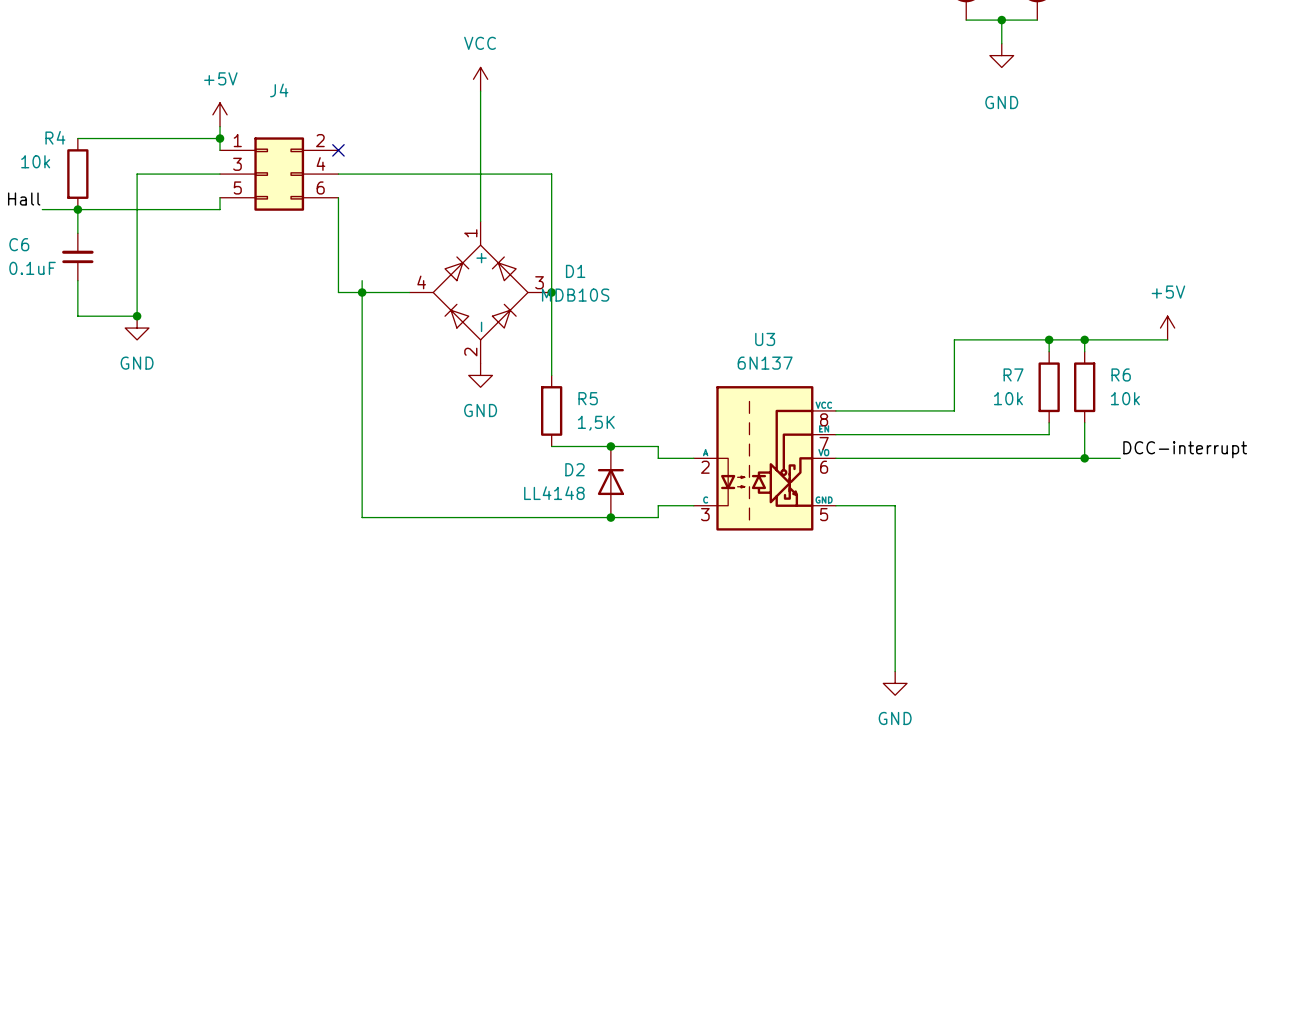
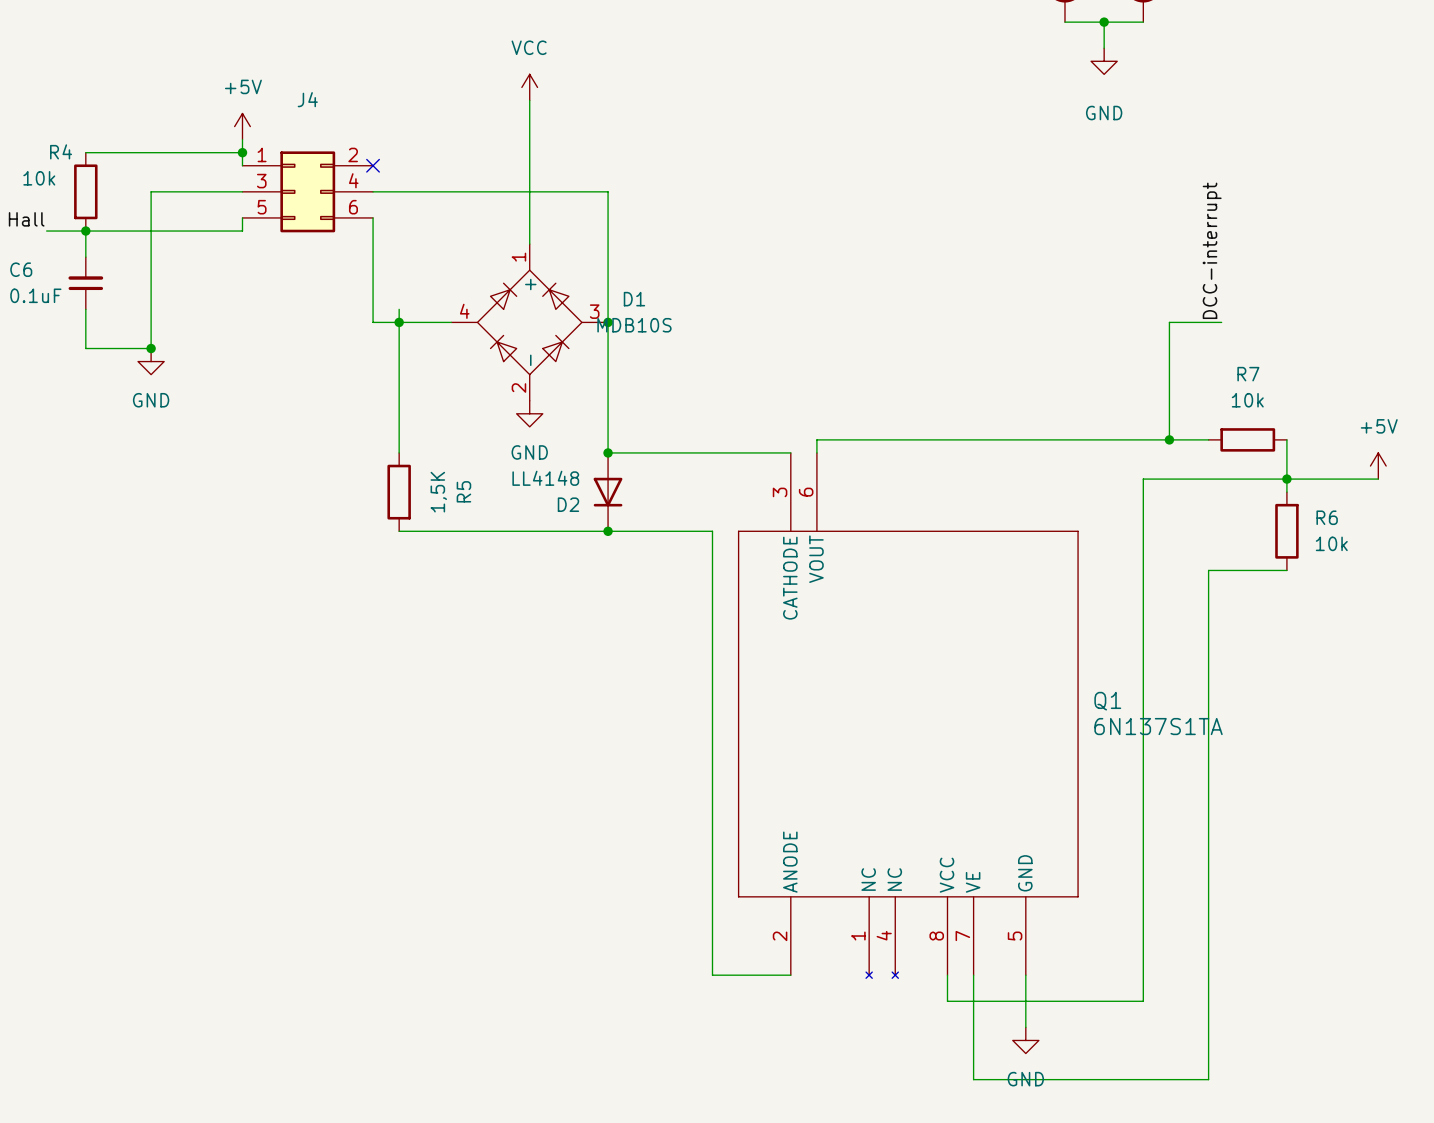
wire: none -> (1221, 322) (1169, 322) (1169, 439)
power symbol position: +5V (1167, 328) -> +5V (1378, 466)
wire: (1049, 339) (1049, 351) -> none
junction: (1049, 339) -> none
wire: (1084, 339) (1084, 351) -> none
junction: (1084, 339) -> none
wire: (1167, 339) (954, 339) (954, 410) (835, 410) -> none
R7 name position: R7 (1013, 374) -> R7 (1248, 374)
wire: none -> (608, 413) (608, 452) (790, 452)
R7 rotation: 0° (1049, 387) -> 90° clockwise (1247, 439)
R7 position: (1049, 387) -> (1247, 439)
R6 position: (1084, 387) -> (1286, 531)
R5 name rotation: 0° (588, 398) -> 90° counterclockwise (463, 491)
junction: none -> (1169, 439)
wire: none -> (1208, 439) (816, 439) (816, 452)
wire: none -> (1286, 439) (1286, 492)
wire: (362, 410) (362, 517) (658, 517) (658, 505) (693, 505) -> none
junction: none -> (608, 452)
R5 position: (551, 410) -> (399, 492)
wire: (1049, 422) (1049, 434) -> (1378, 479) (1156, 479)
wire: (1084, 422) (1084, 458) -> none
R5 value rotation: 0° (596, 423) -> 90° counterclockwise (438, 492)
wire: (835, 434) (1037, 434) -> (947, 975) (947, 1001) (1143, 1001) (1143, 479)
junction: none -> (1286, 479)
wire: (551, 446) (658, 446) (658, 458) (693, 458) -> none
junction: (610, 446) -> none
label rotation: 0° (1185, 449) -> 90° counterclockwise (1212, 250)
label position: DCC-interrupt (1185, 449) -> DCC-interrupt (1212, 250)
U3: 6N137 (764, 458) -> none
wire: (835, 458) (1120, 458) -> none
junction: (1084, 458) -> none
D2 name position: D2 (574, 469) -> D2 (568, 504)
wire: none -> (399, 531) (712, 531) (712, 975) (790, 975)
junction: none -> (608, 531)
D2 rotation: 0° (610, 482) -> 180° (608, 492)
D2 position: (610, 482) -> (608, 492)
D2 value position: LL4148 (554, 493) -> LL4148 (545, 478)
wire: (835, 505) (895, 505) (895, 671) -> none
junction: (610, 517) -> none
wire: none -> (1286, 570) (1208, 570) (1208, 1079) (973, 1079) (973, 975)
Q1: none -> 6N137S1TA (908, 715)
power symbol: GND (895, 683) -> none
wire: none -> (1025, 975) (1025, 1027)
power symbol: none -> GND (1025, 1040)

